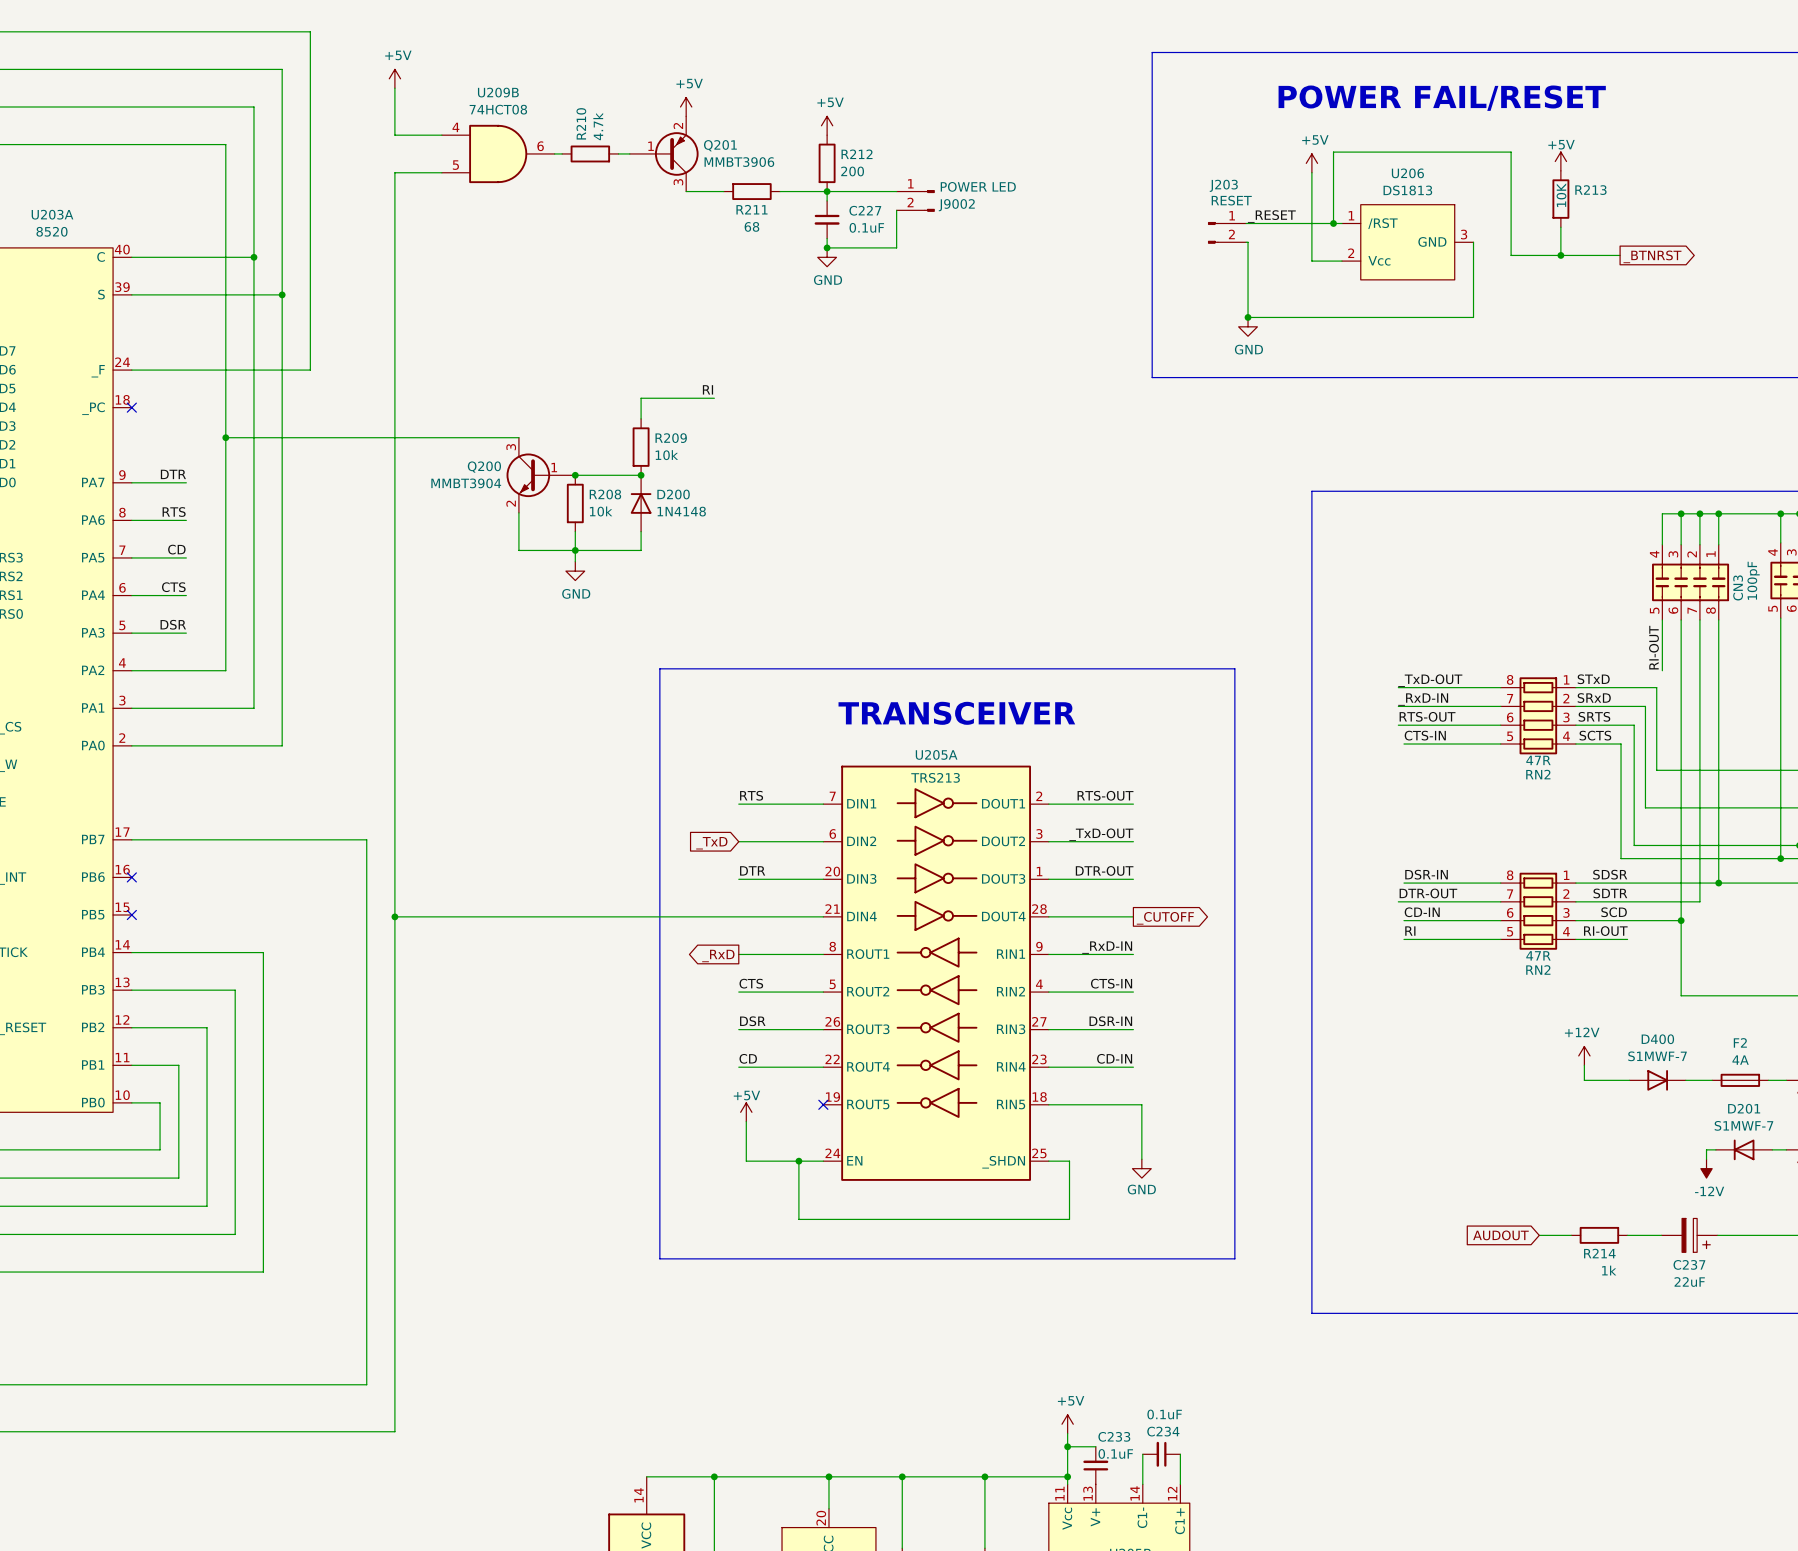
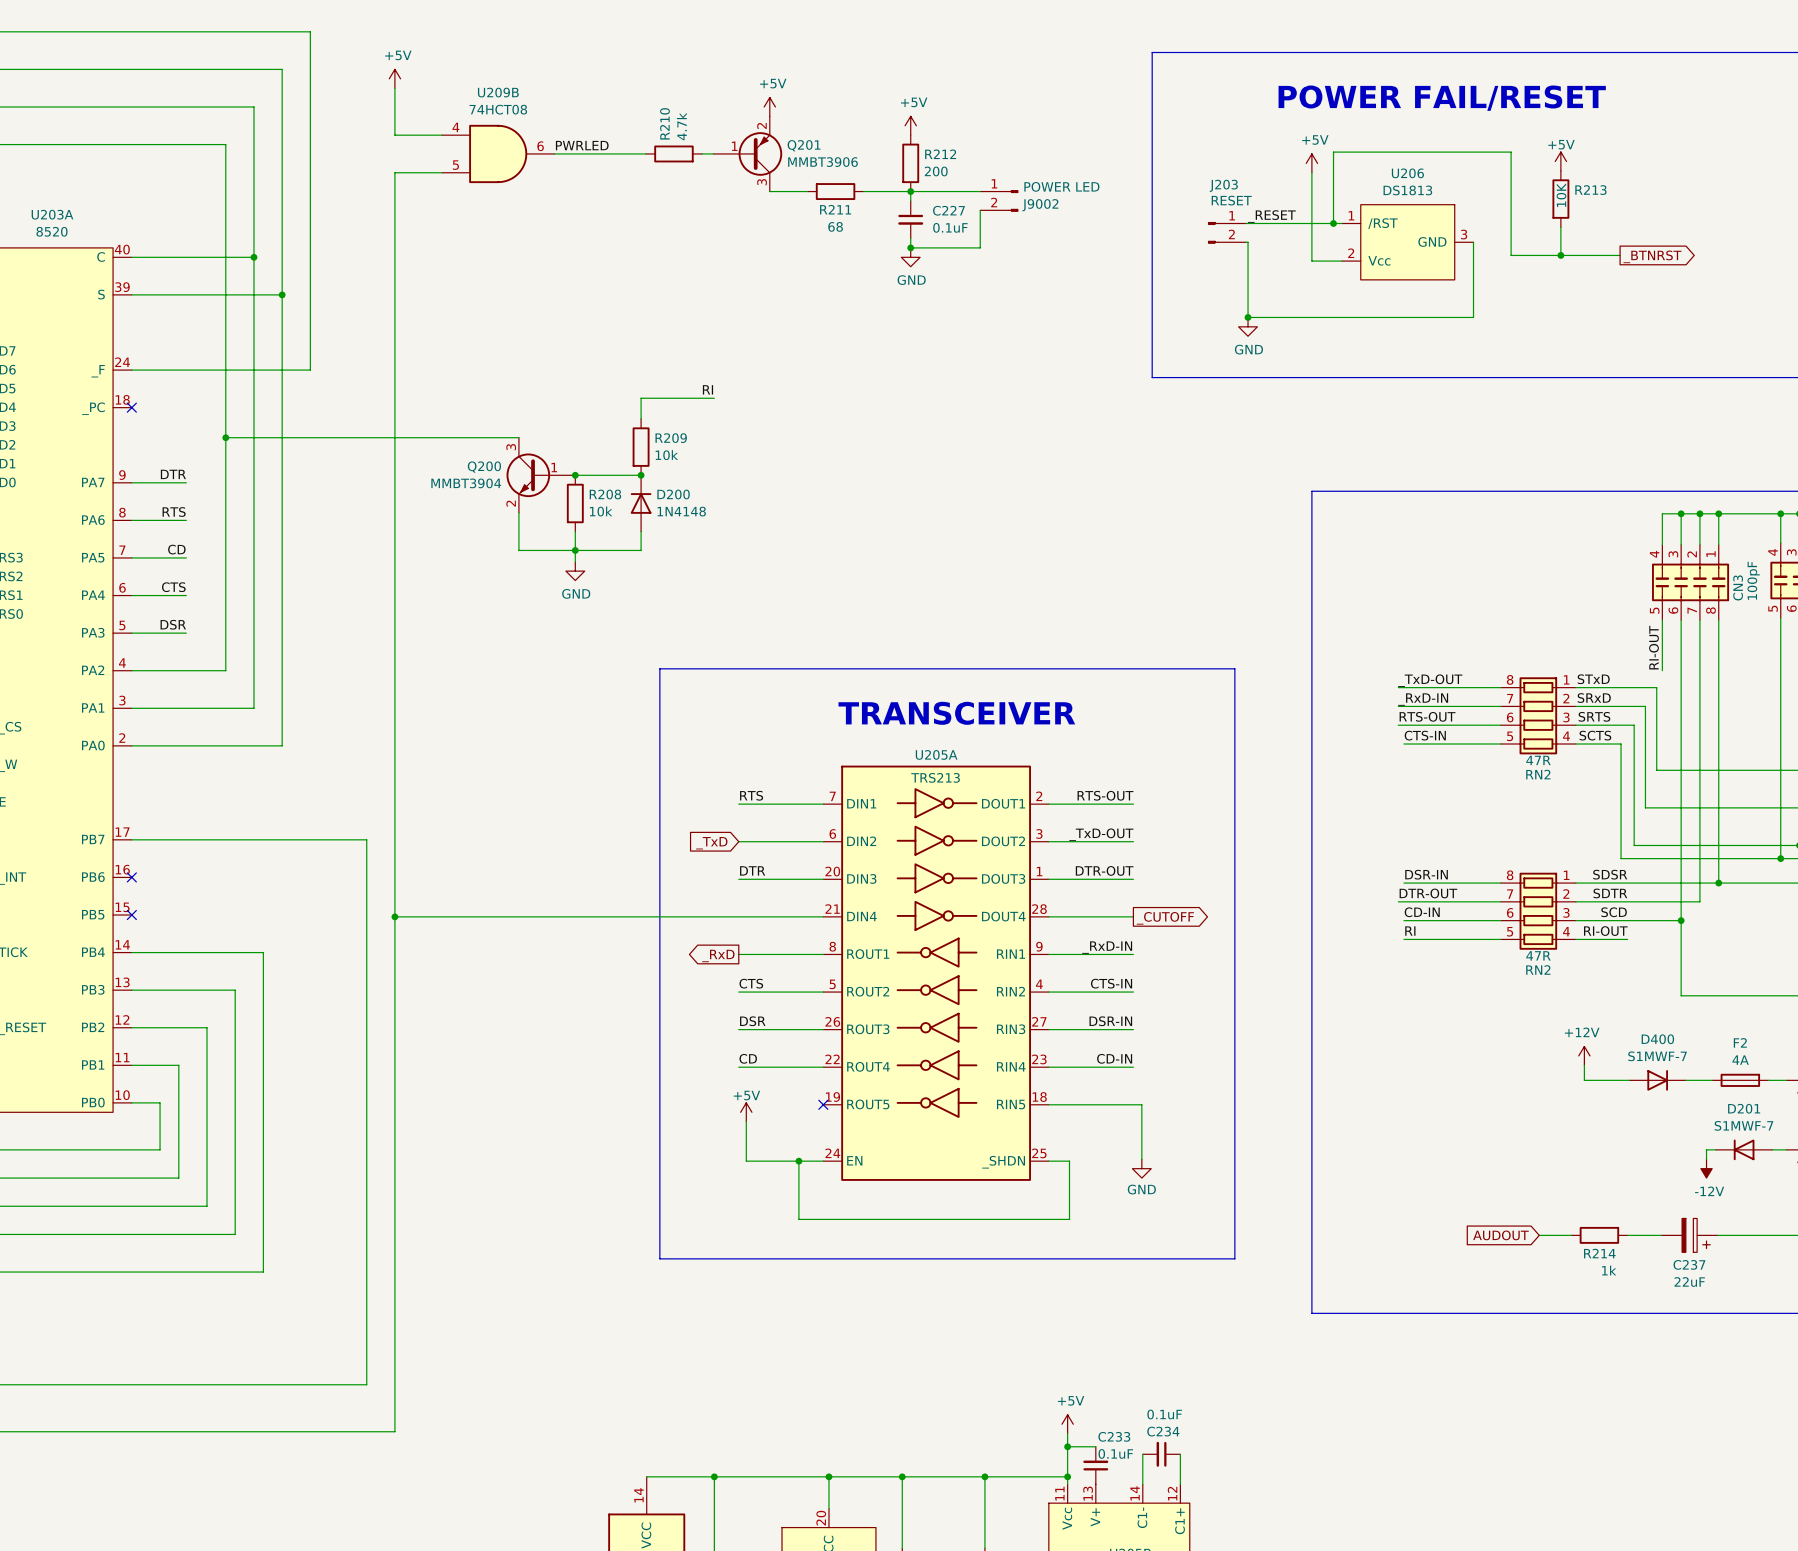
power symbol: +5V (686, 106) -> none
power symbol: none -> +5V (769, 106)
power symbol: +5V (827, 125) -> none
power symbol: none -> +5V (910, 125)
label: none -> PWRLED (582, 145)
wire: none -> (562, 153) (618, 153)
R210 position: (590, 153) -> (673, 153)
Q201 position: (664, 153) -> (747, 153)
wire: none -> (702, 153) (713, 153)
R212 position: (827, 163) -> (910, 163)
wire: (686, 191) (723, 191) -> none
R211 position: (751, 191) -> (835, 191)
wire: (807, 191) (863, 191) -> none
wire: (827, 191) (827, 200) -> (910, 191) (910, 200)
junction: (827, 191) -> none
wire: none -> (896, 191) (980, 191)
junction: none -> (910, 191)
J9002 position: (915, 200) -> (999, 200)
wire: (896, 210) (896, 247) (827, 247) (827, 238) -> (980, 210) (980, 247) (910, 247) (910, 238)
C227 position: (827, 219) -> (910, 219)
junction: (827, 247) -> none
junction: none -> (910, 247)
power symbol position: GND (827, 257) -> GND (910, 257)

